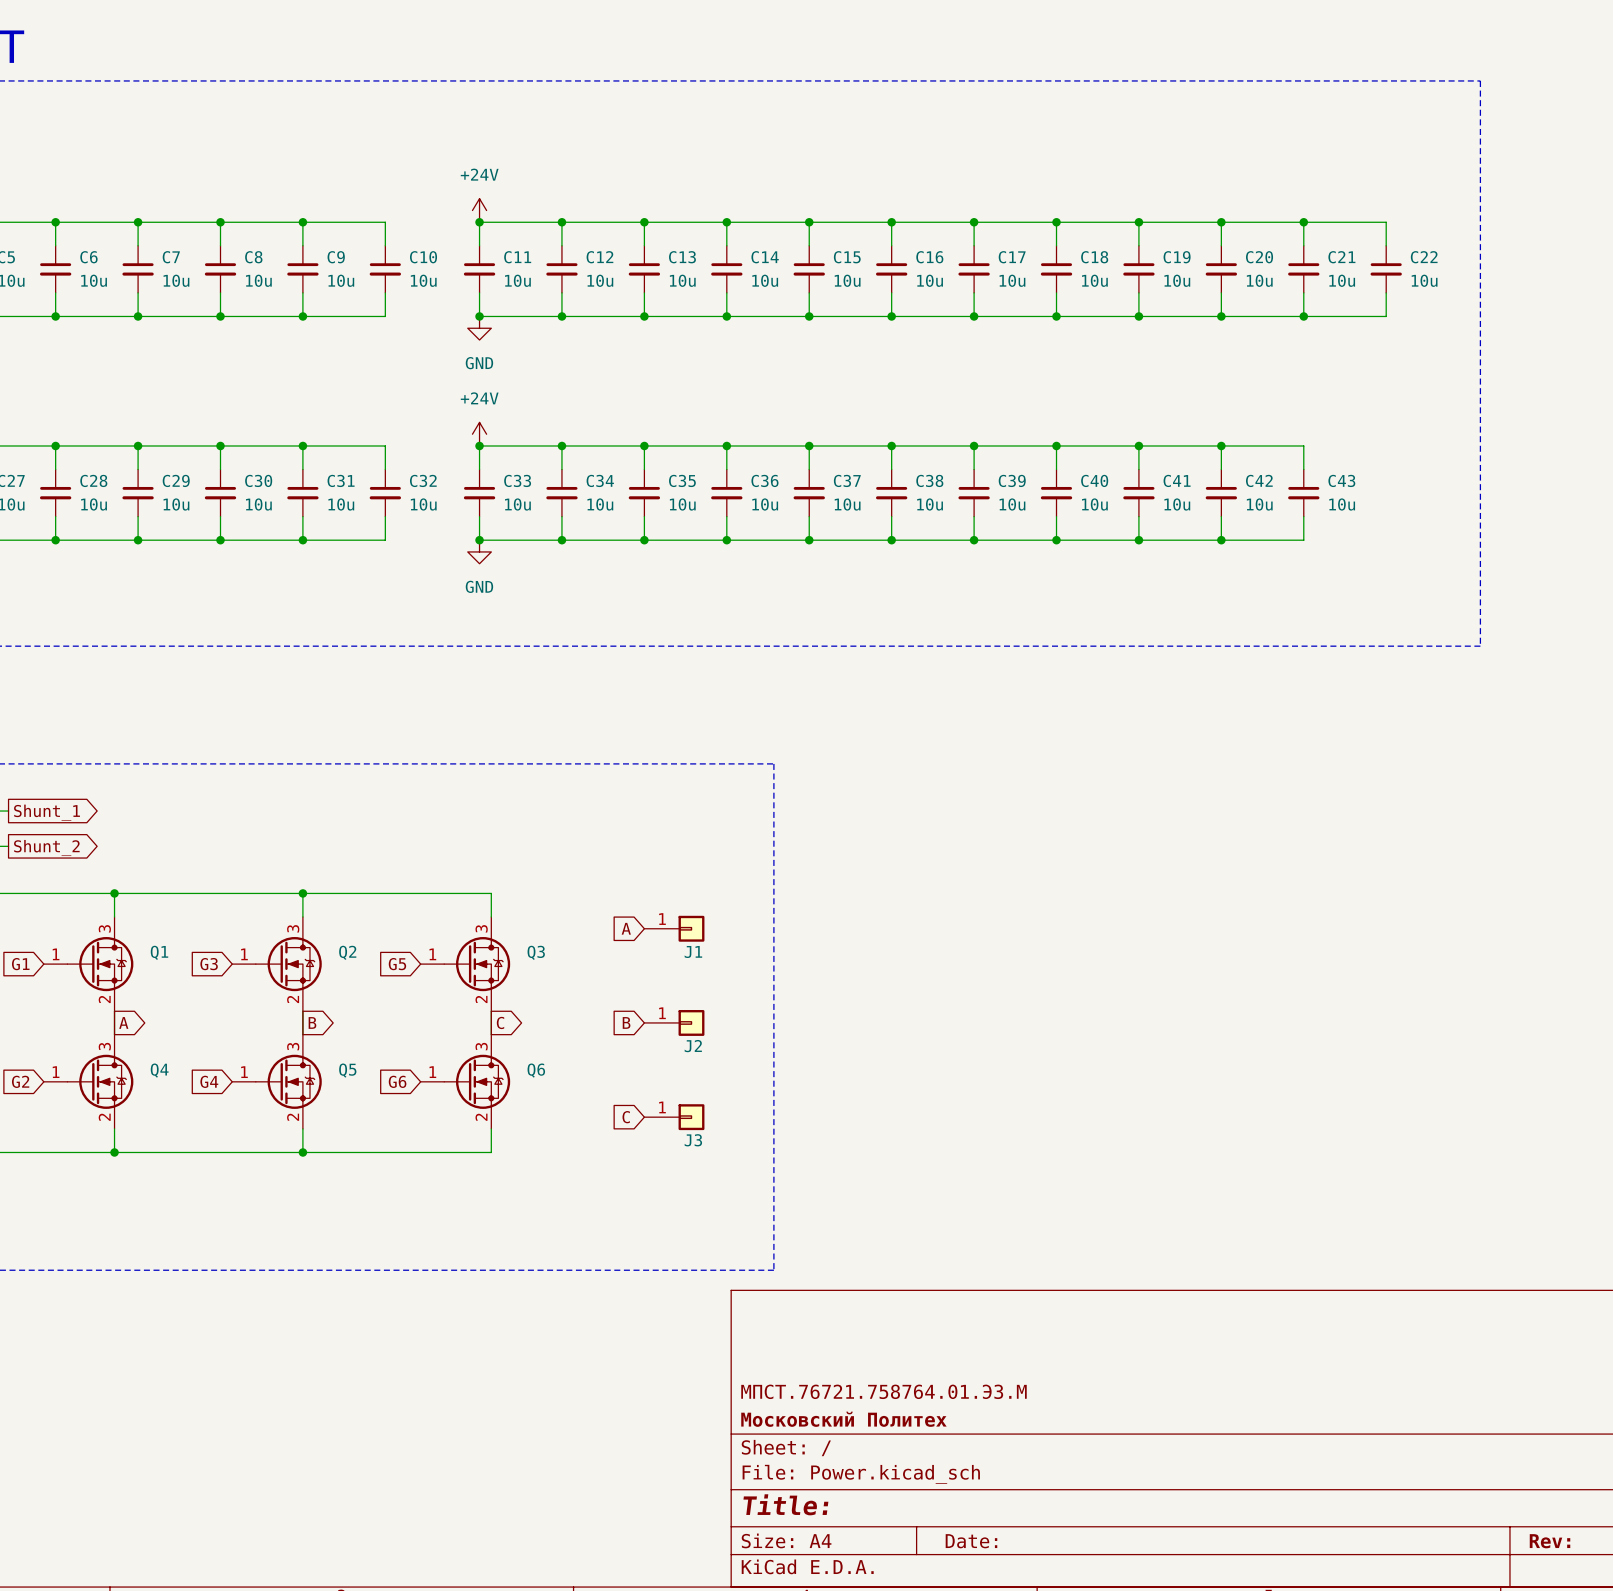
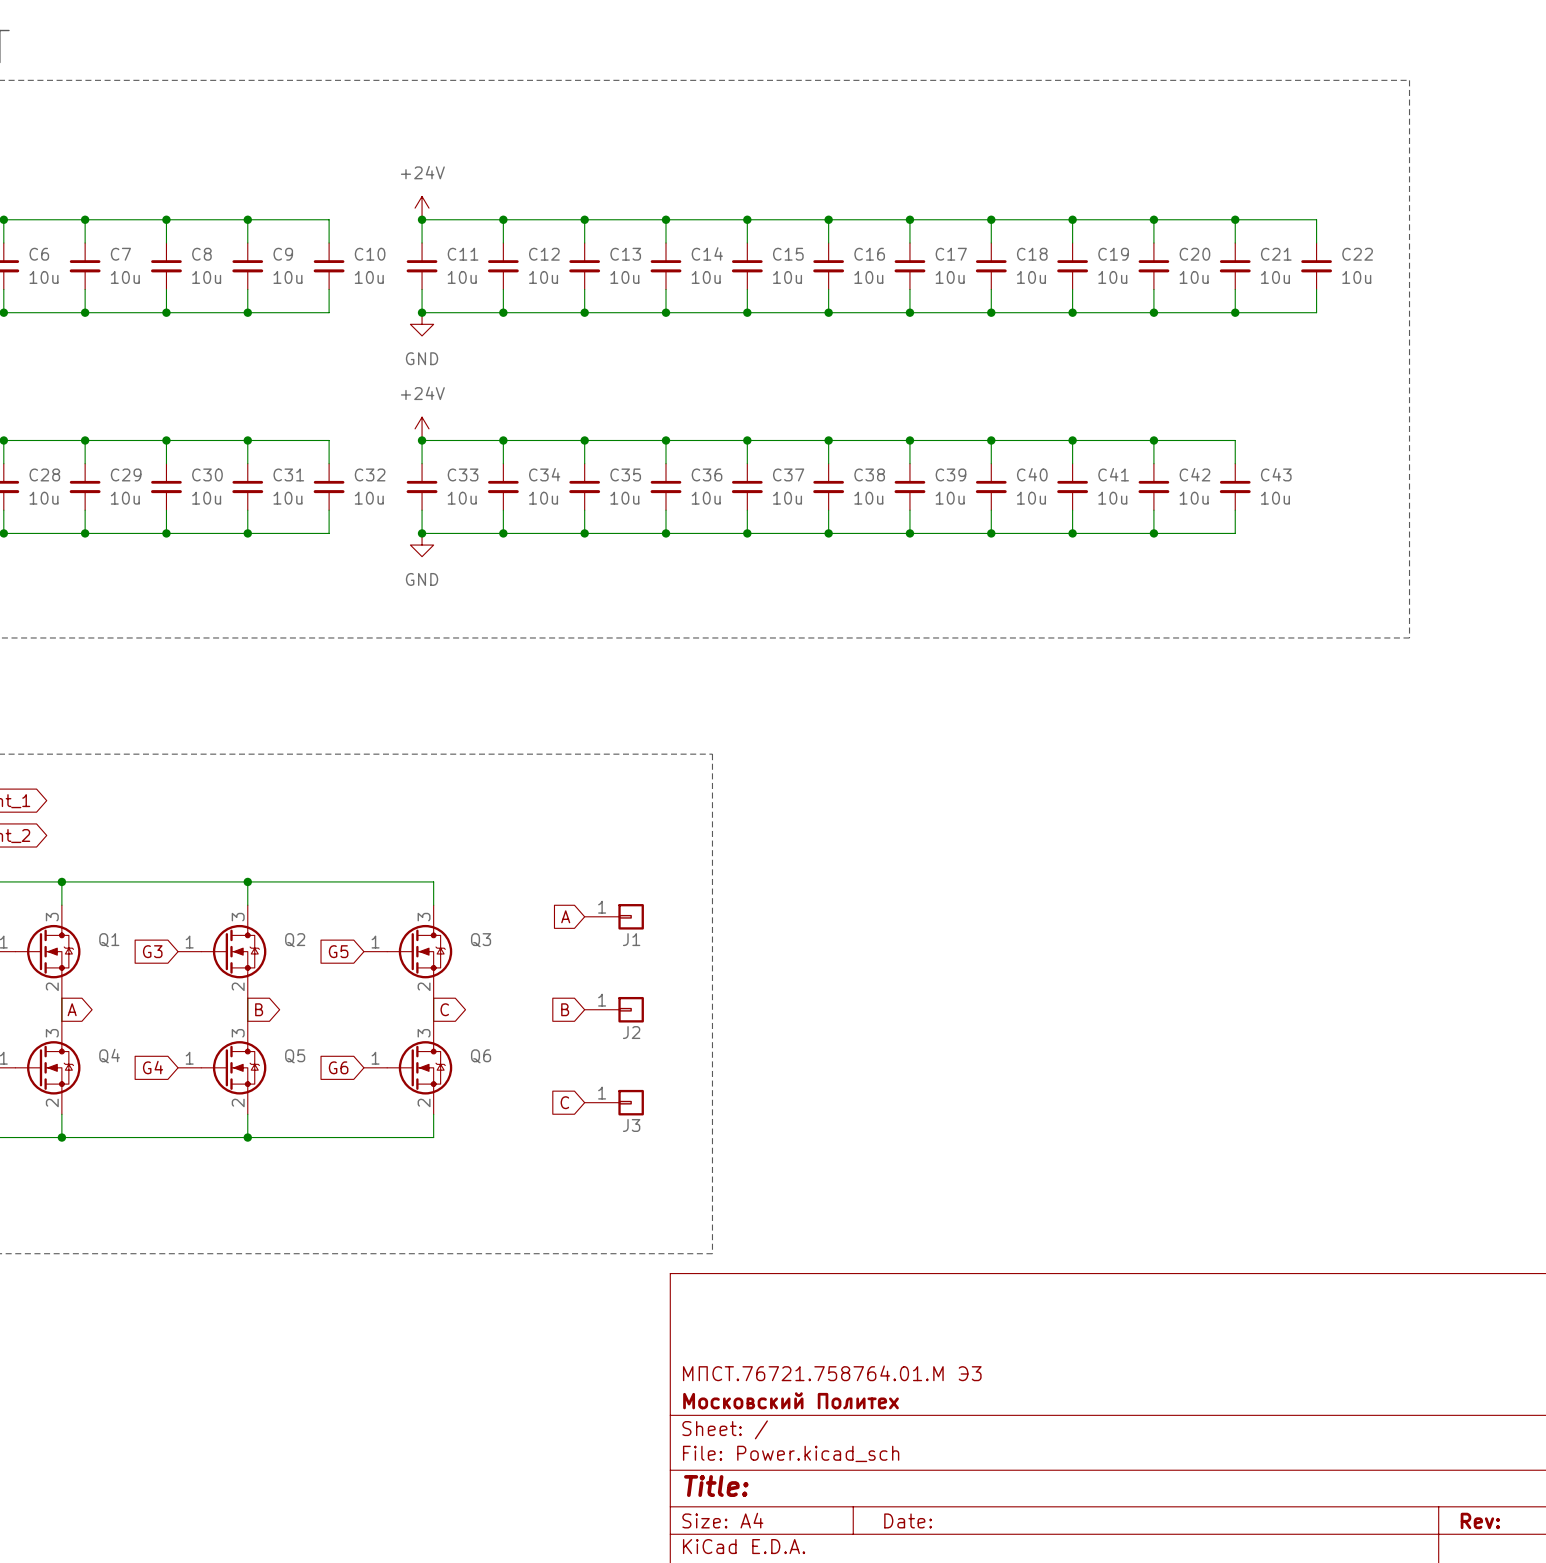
title block: МПСТ.76721.758764.01.Э3.М (883, 1391) -> МПСТ.76721.758764.01.М Э3 (832, 1373)

